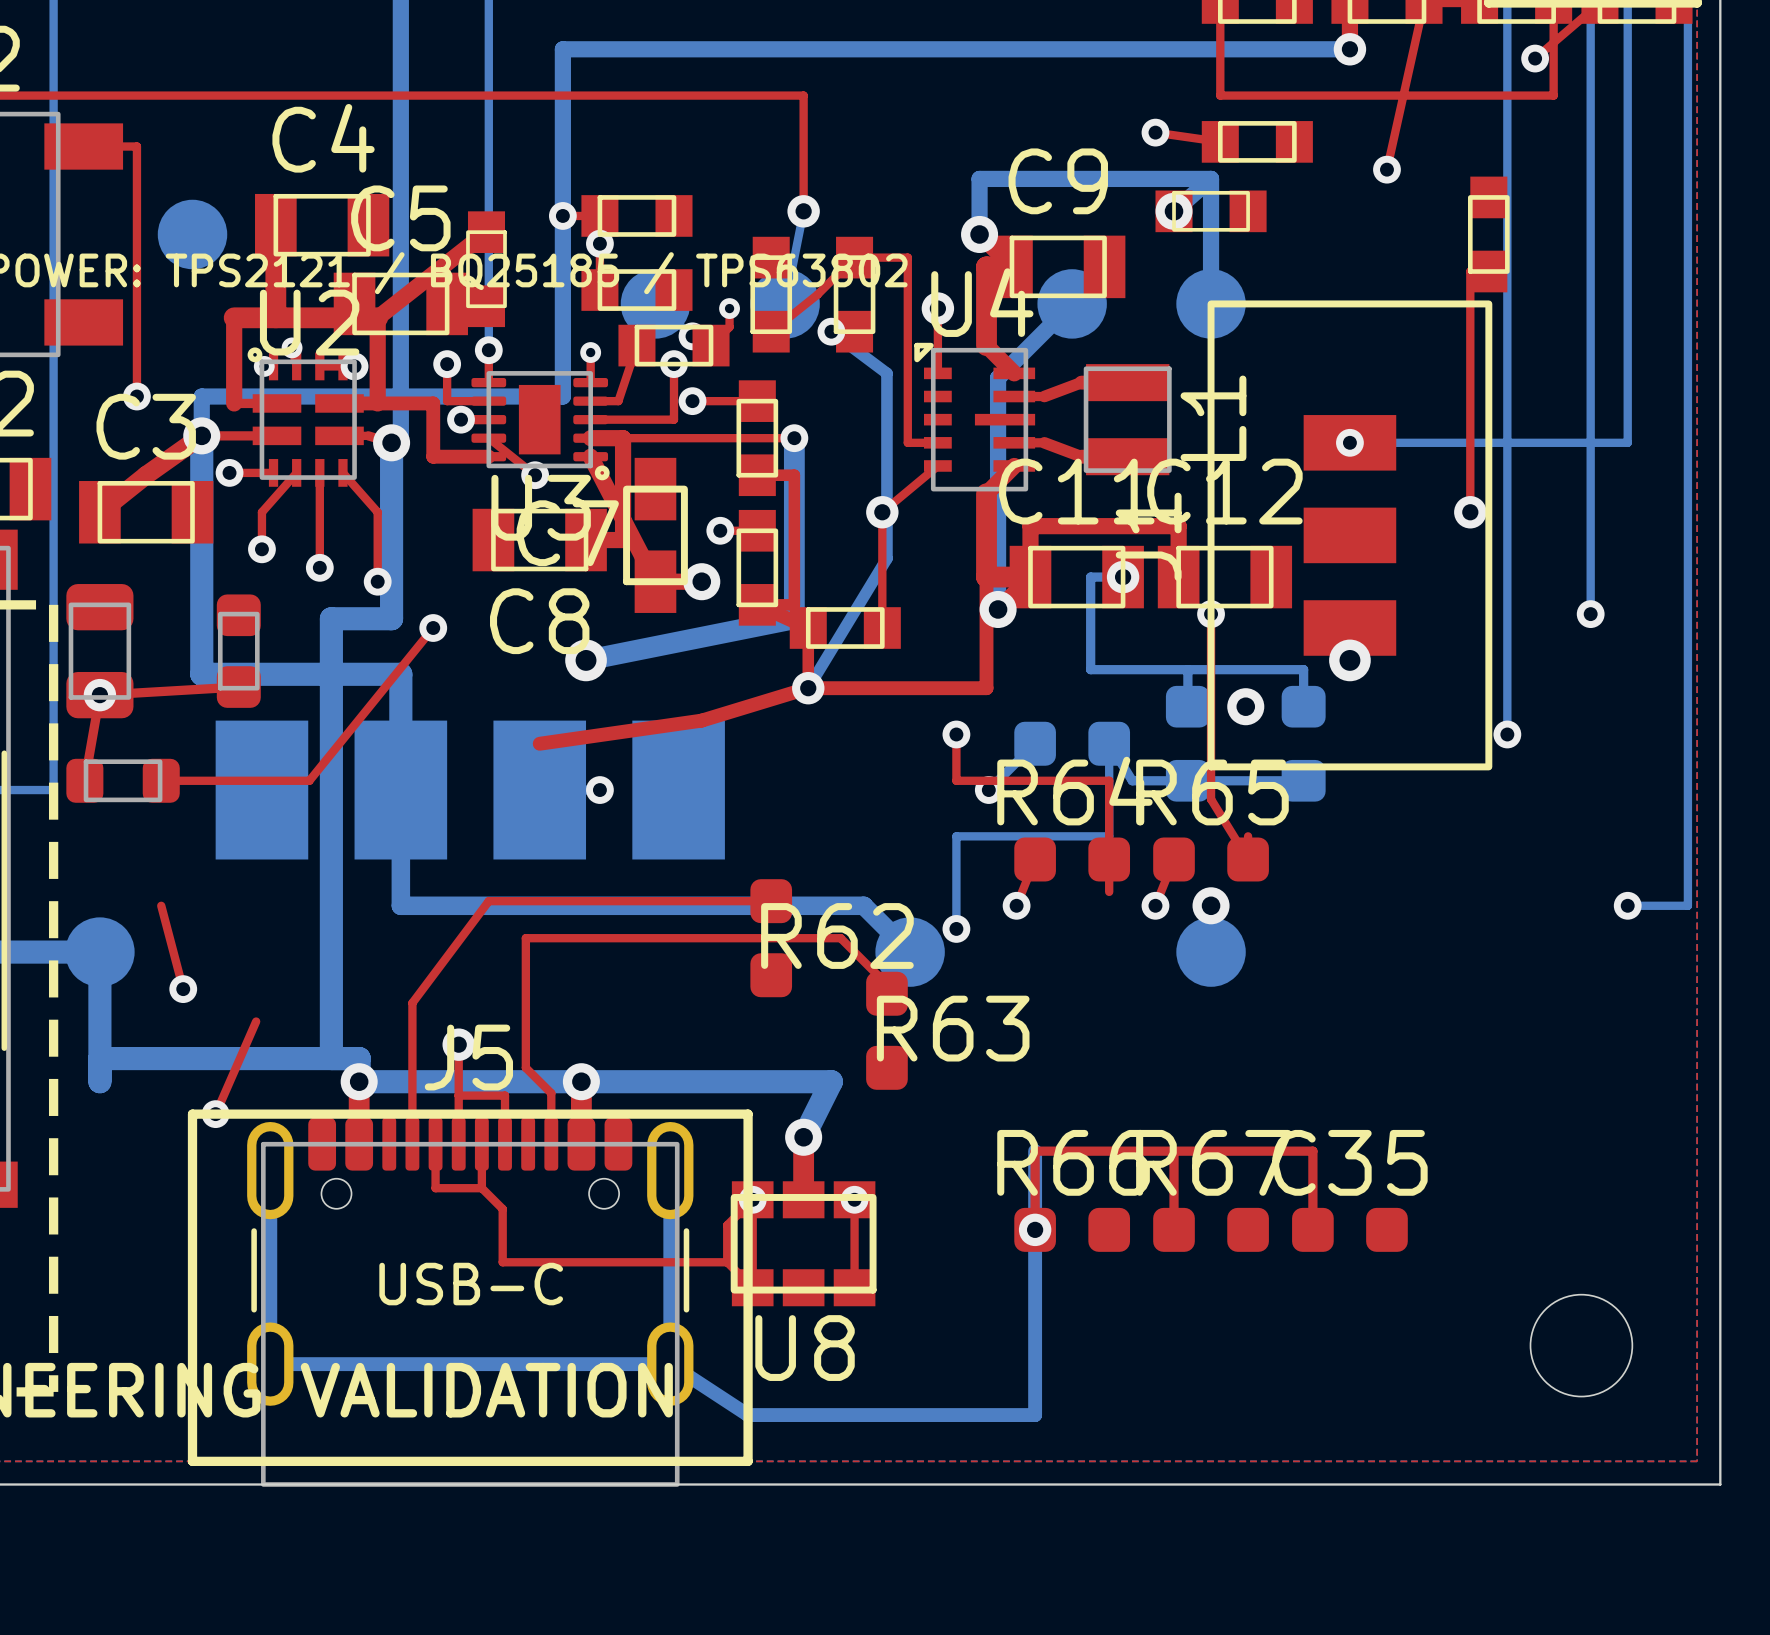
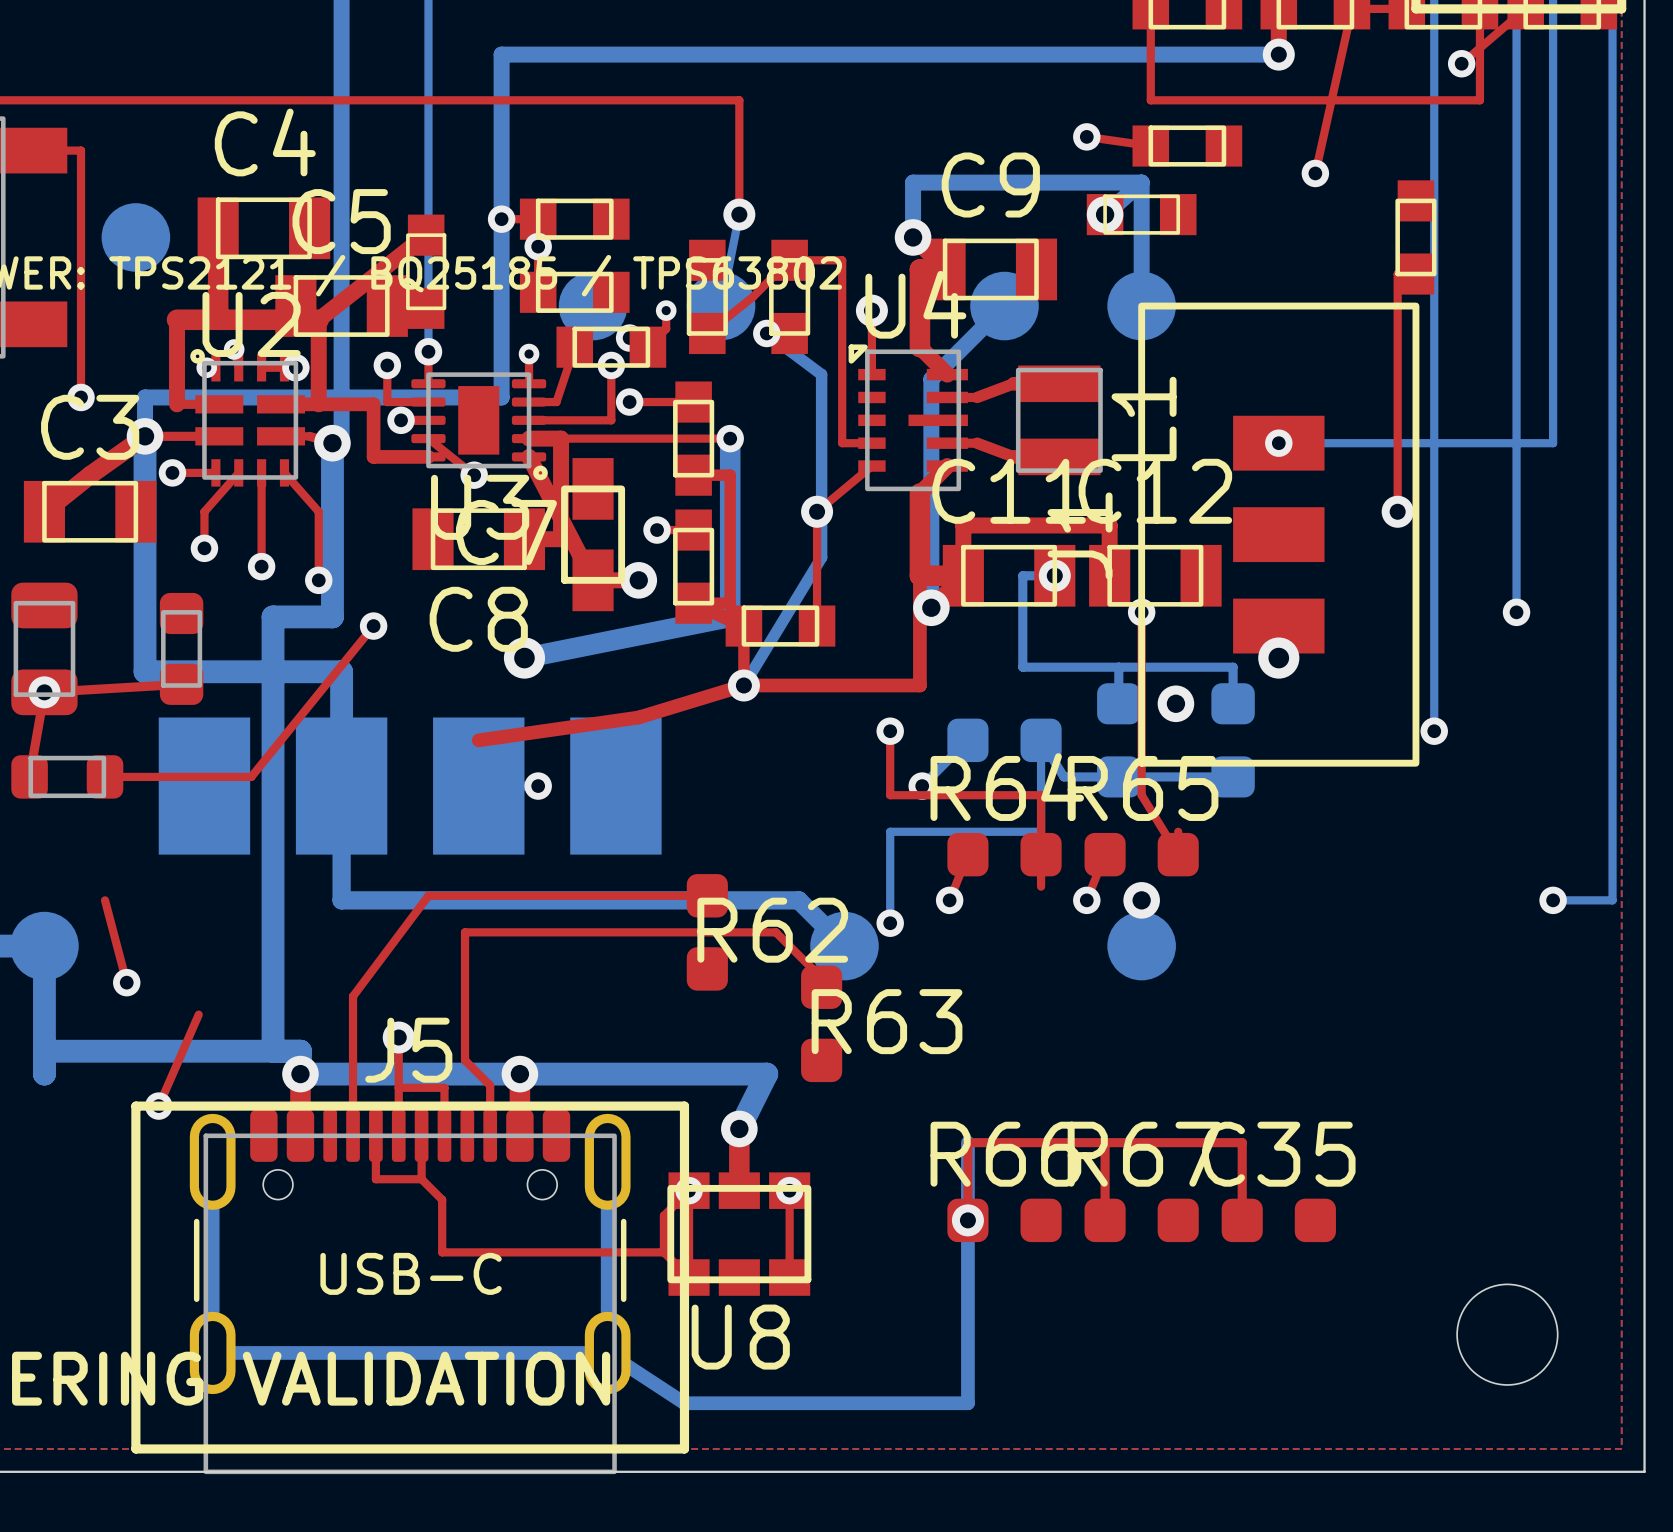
top track: (956, 780) (1109, 780) (1109, 799) -> (890, 776) (890, 795) (1041, 795)

